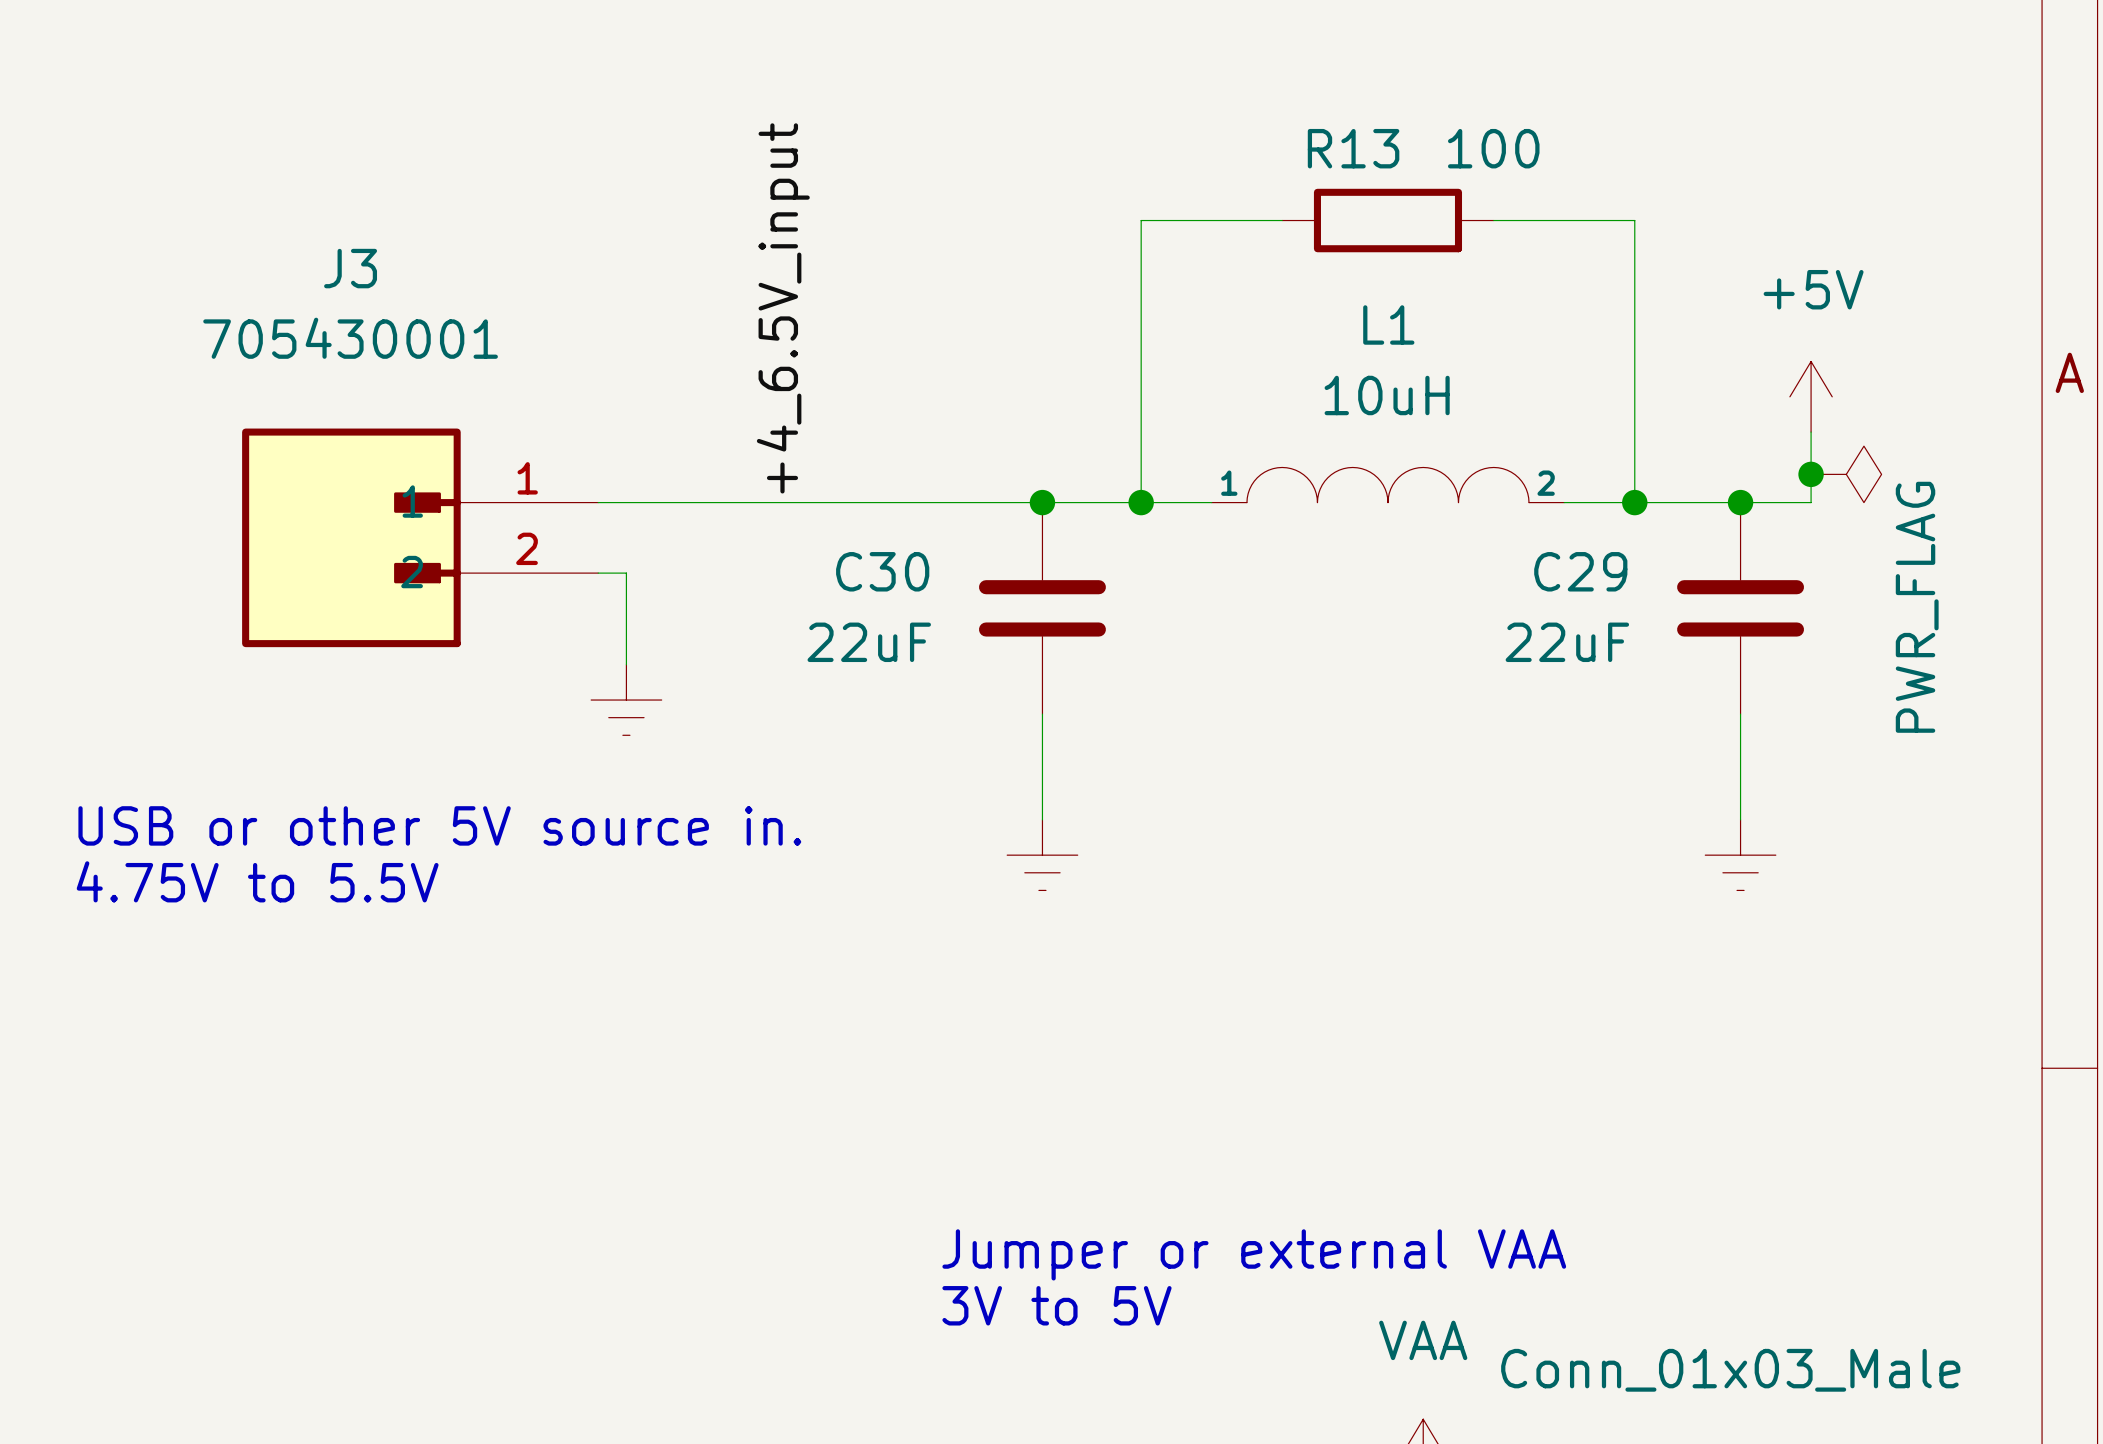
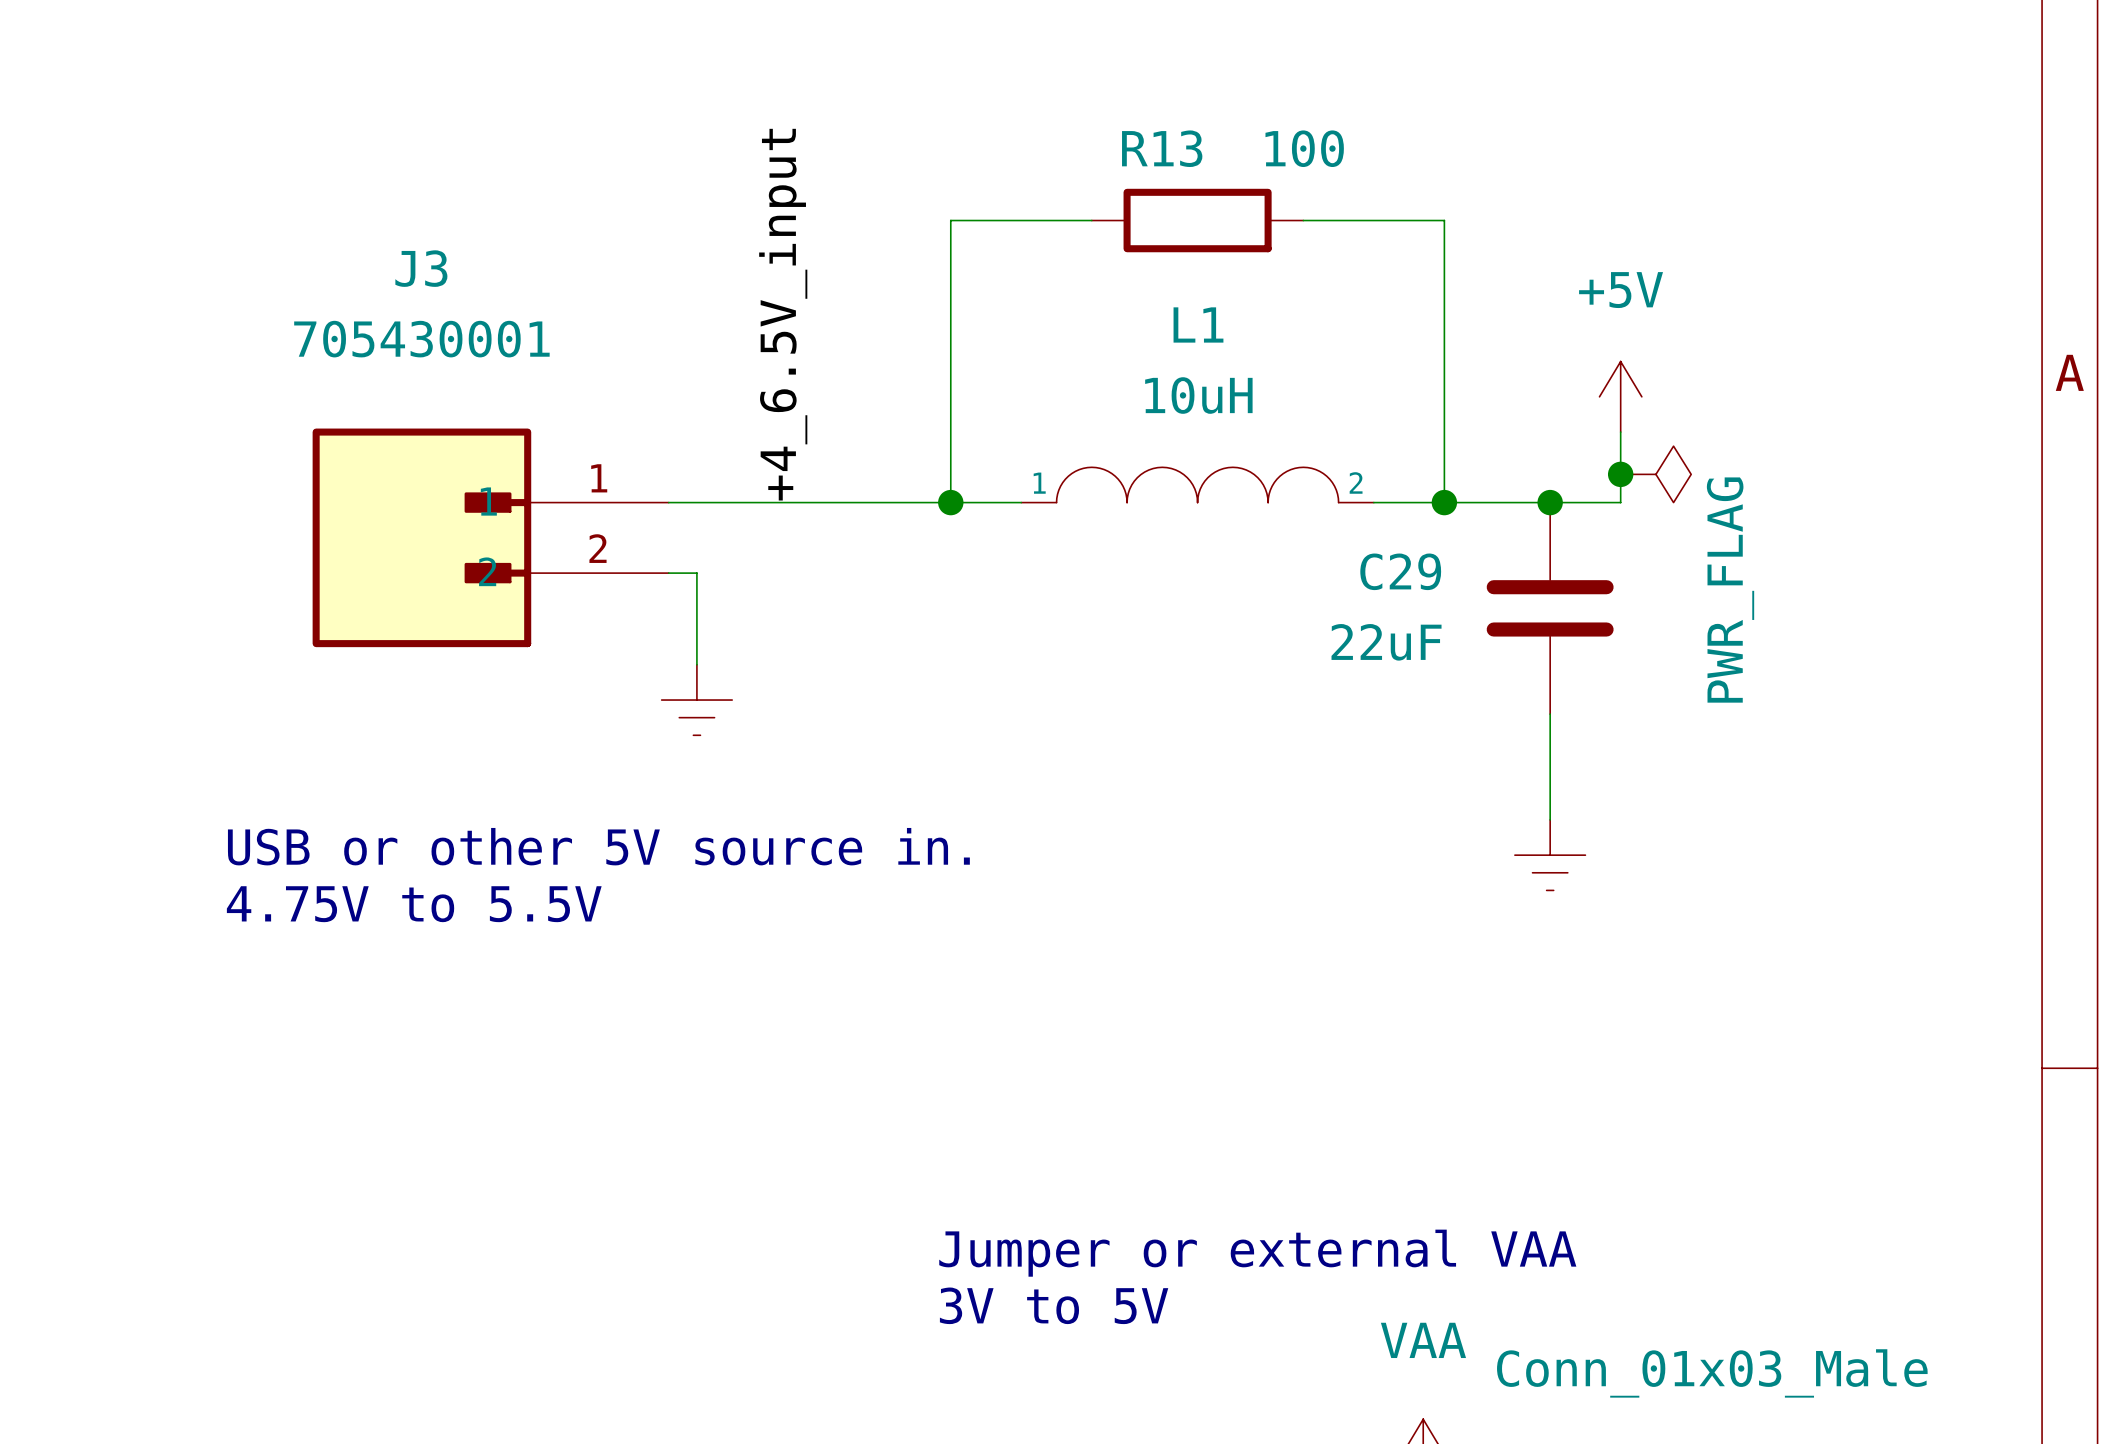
wire: (1282, 220) (1141, 220) (1141, 502) -> (1091, 220) (950, 220) (950, 502)
R13 position: (1387, 220) -> (1197, 220)
wire: (1493, 220) (1634, 220) (1634, 502) -> (1303, 220) (1444, 220) (1444, 502)
power symbol position: +5V (1811, 396) -> +5V (1620, 396)
wire: (1811, 432) (1811, 502) (1620, 502) -> (1620, 432) (1620, 502)
L1 symbol: [1211, 467, 1565, 503] -> [1021, 467, 1374, 503]
junction: (1811, 474) -> none
power symbol position: PWR_FLAG (1846, 474) -> PWR_FLAG (1655, 474)
wire: (1021, 502) (1211, 502) -> (1373, 502) (1564, 502)
junction position: (1042, 502) -> (950, 502)
junction: (1141, 502) -> none
junction: none -> (1444, 502)
junction: none -> (1550, 502)
junction position: (1634, 502) -> (1620, 474)
junction: (1740, 502) -> none
J3 position: (420, 537) -> (490, 537)
wire: (598, 573) (626, 573) (626, 664) -> (668, 573) (696, 573) (696, 664)
C30: 22uF (1042, 608) -> none
C29 position: (1740, 608) -> (1550, 608)
power symbol position: (626, 700) -> (696, 700)
wire: (1042, 714) (1042, 819) -> none
wire: (1740, 714) (1740, 819) -> (1550, 714) (1550, 819)
text position: USB or other 5V source in. (439, 825) -> USB or other 5V source in. (598, 846)
power symbol: (1042, 855) -> none
power symbol position: (1740, 855) -> (1550, 855)
text position: 4.75V to 5.5V (257, 881) -> 4.75V to 5.5V (414, 904)

